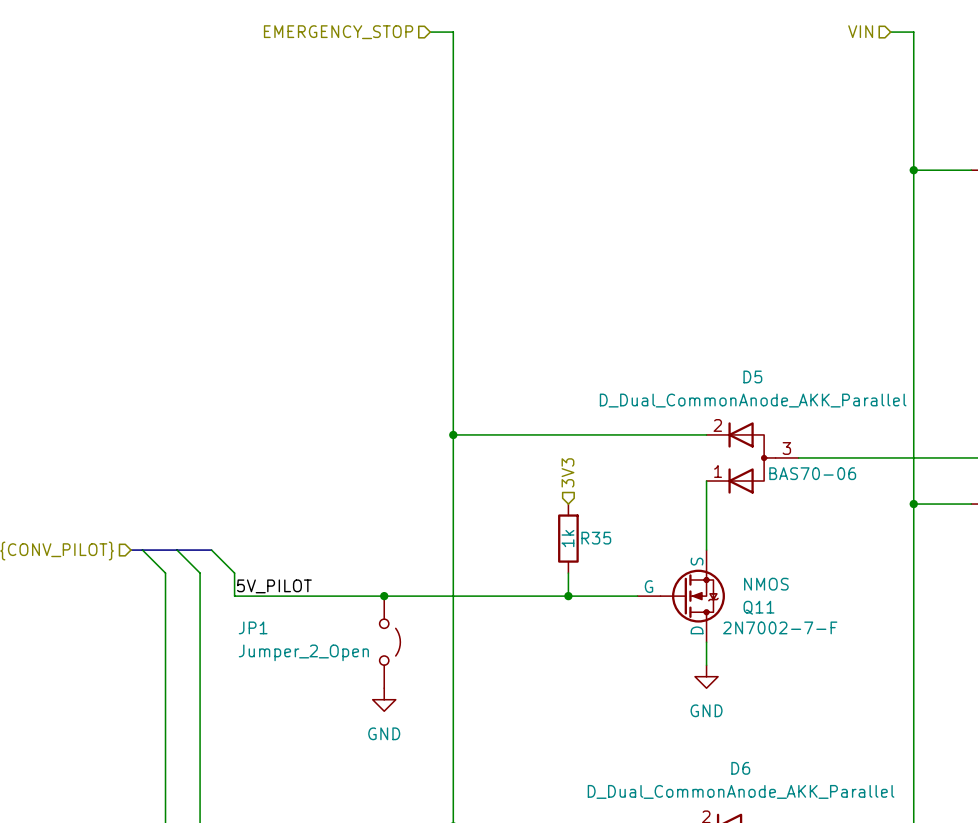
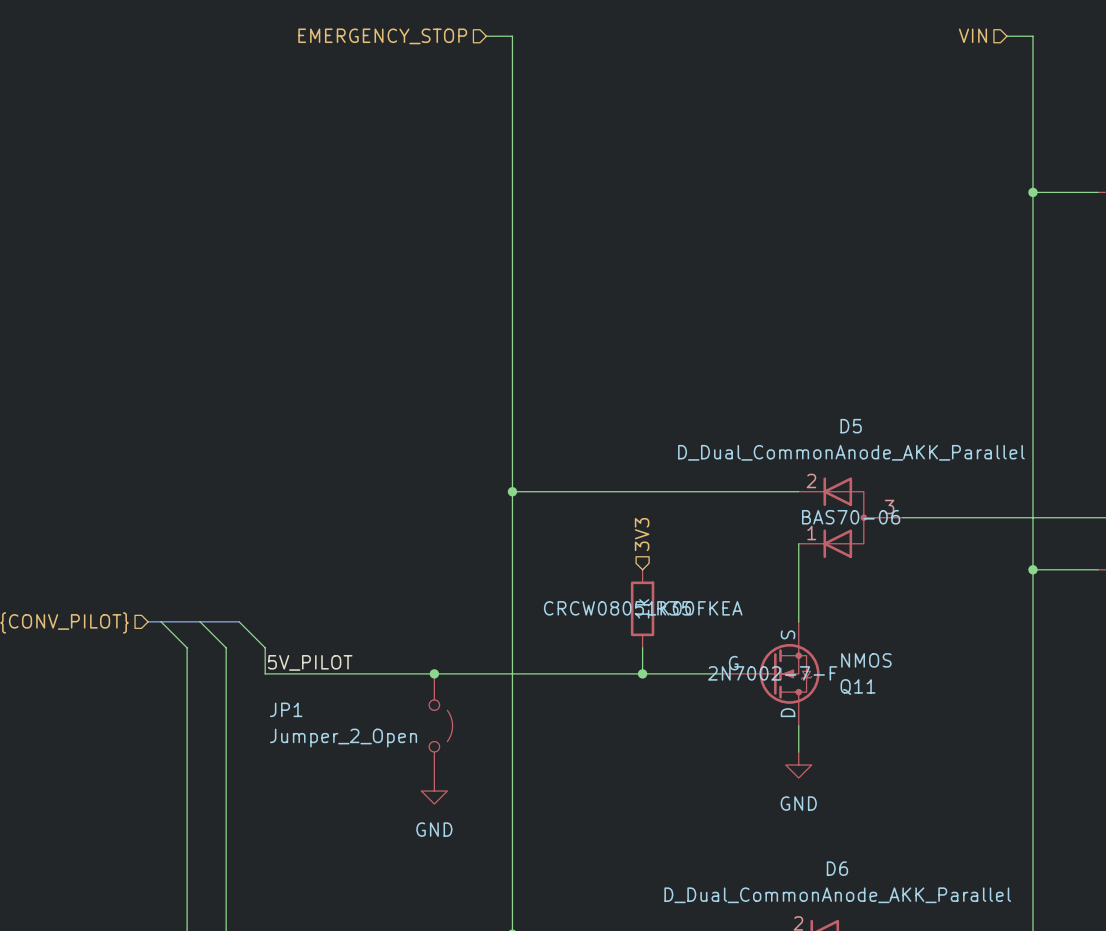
D5 text position: BAS70-06 (812, 473) -> BAS70-06 (851, 517)
R35 text: none -> CRCW08051K00FKEA (643, 608)
Q11 text position: 2N7002-7-F (780, 627) -> 2N7002-7-F (772, 673)

